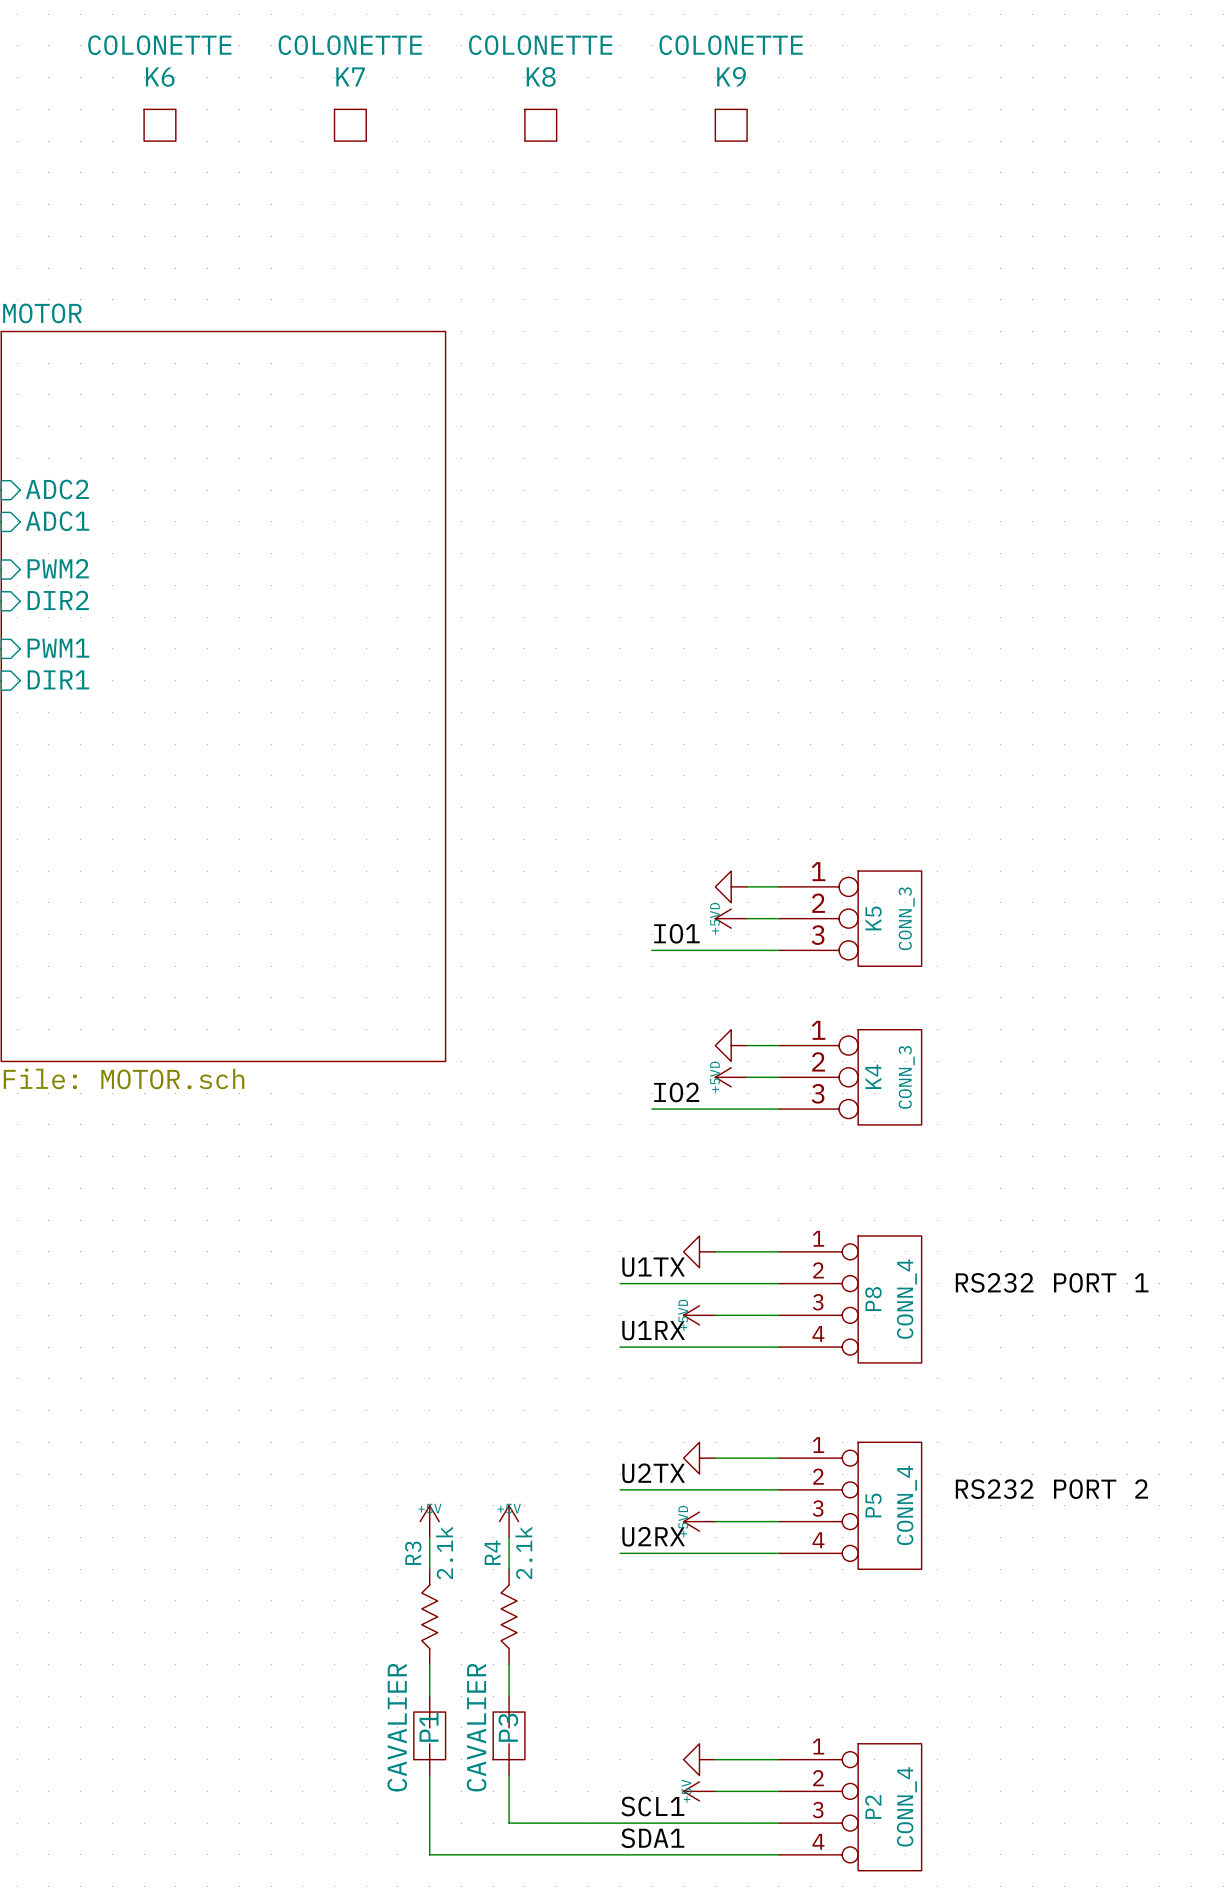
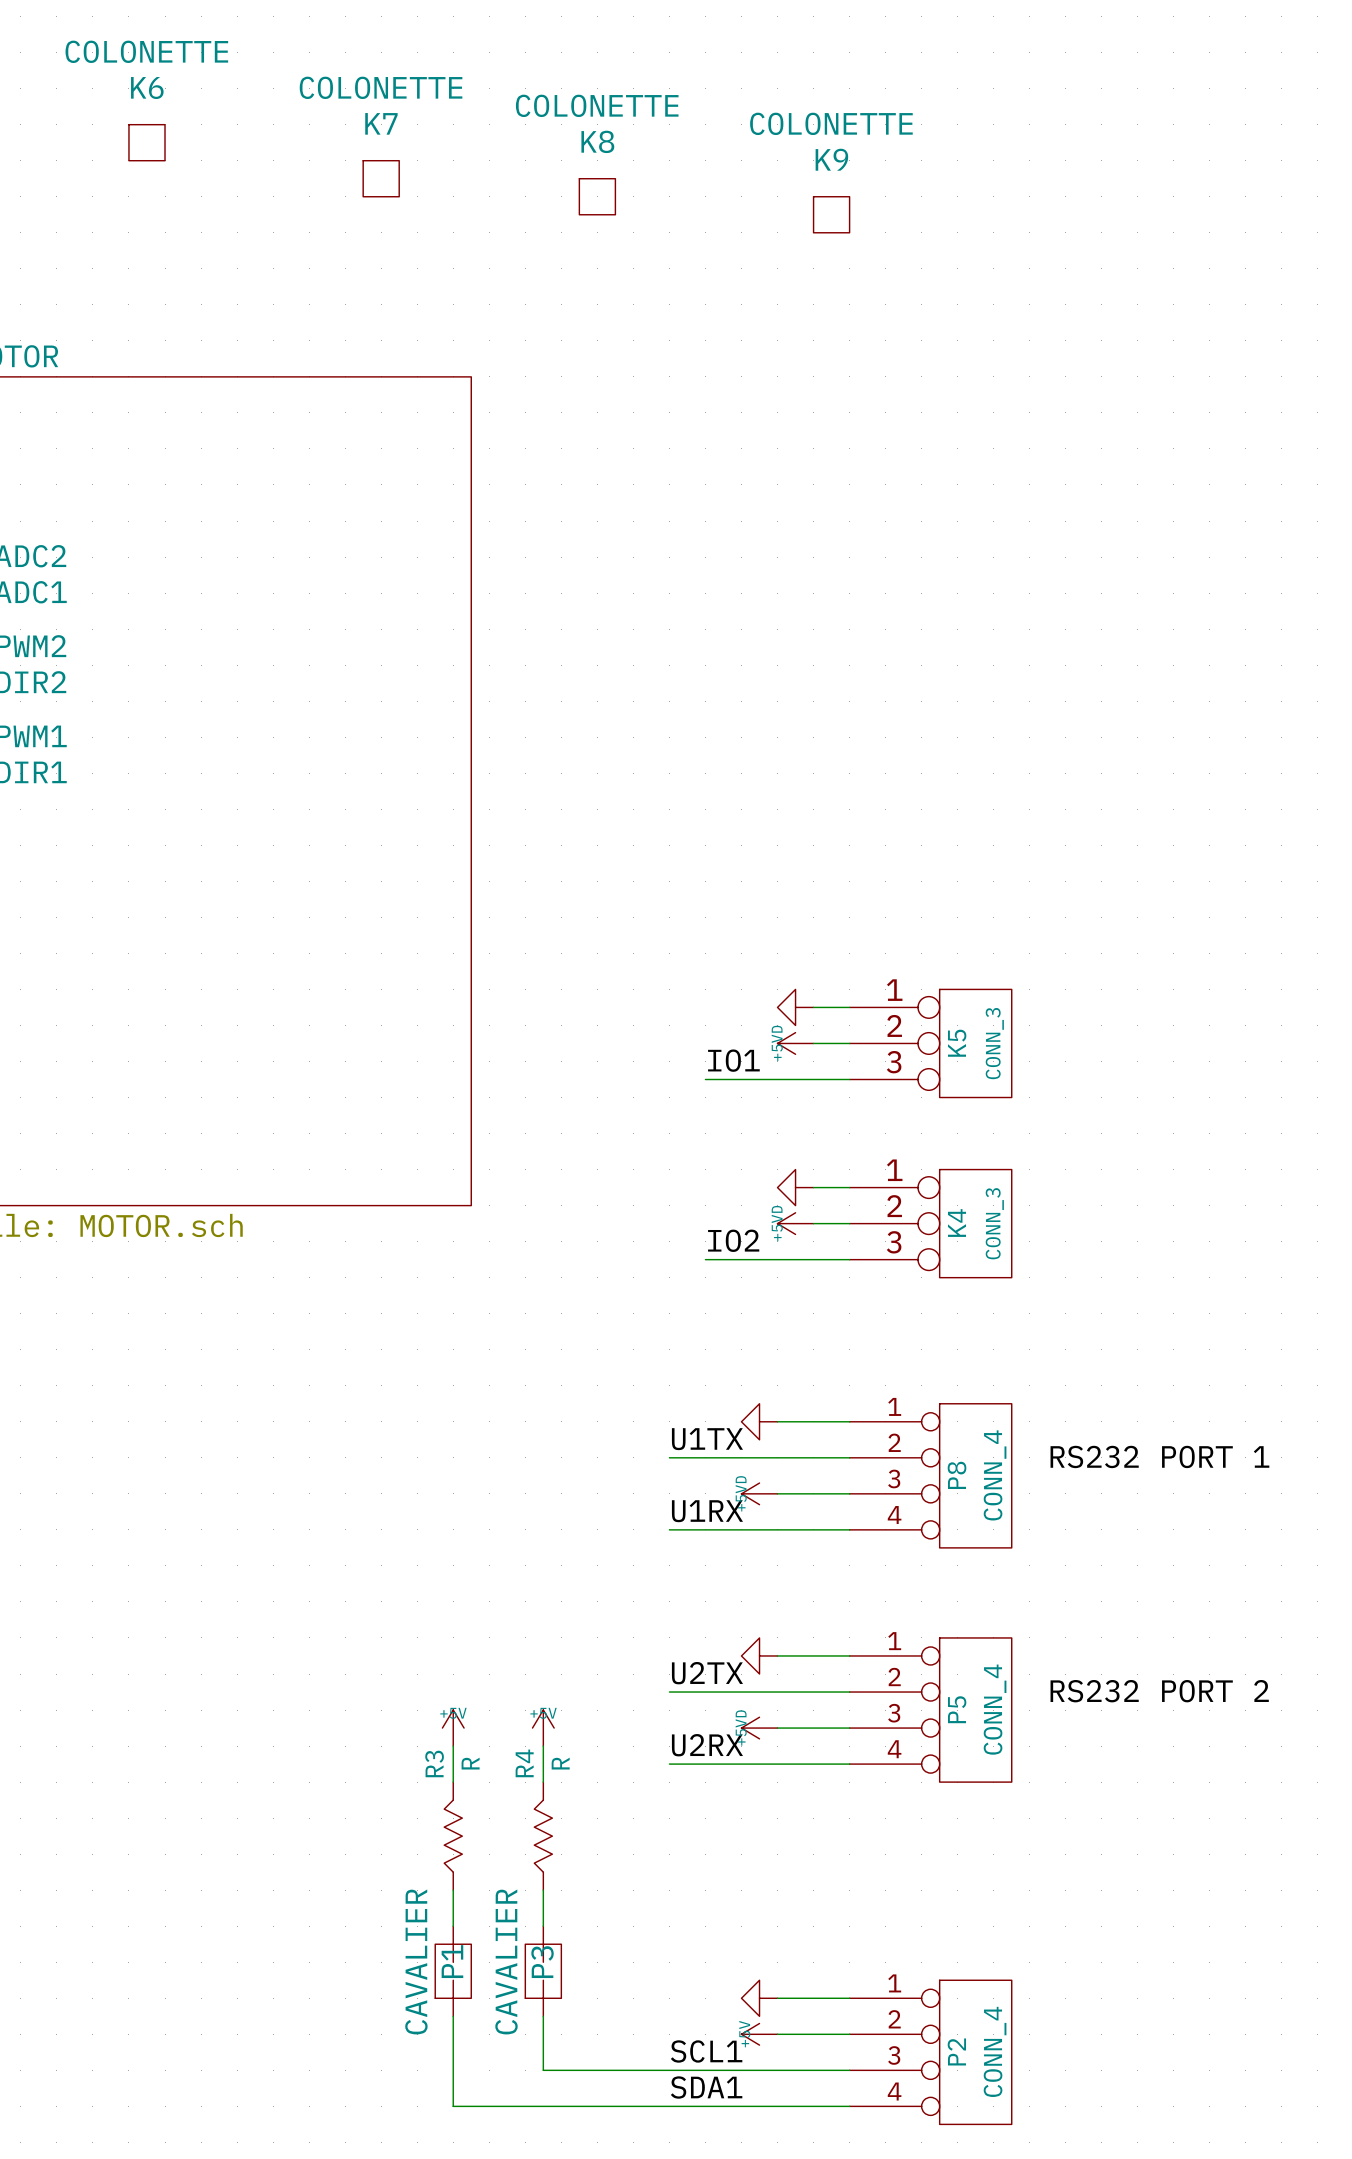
K7 position: (350, 125) -> (381, 178)
K8 position: (540, 125) -> (597, 196)
K9 position: (731, 125) -> (831, 214)
R3 value: 2.1k (444, 1552) -> R (470, 1763)
R4 value: 2.1k (523, 1552) -> R (560, 1763)

